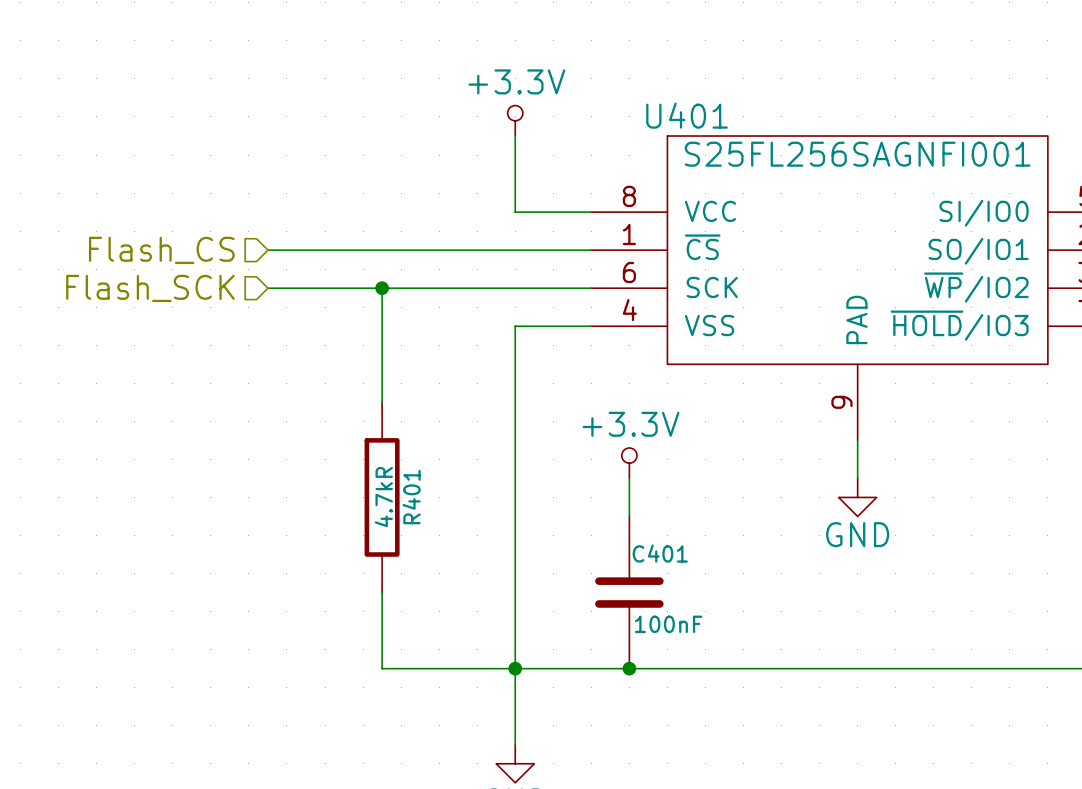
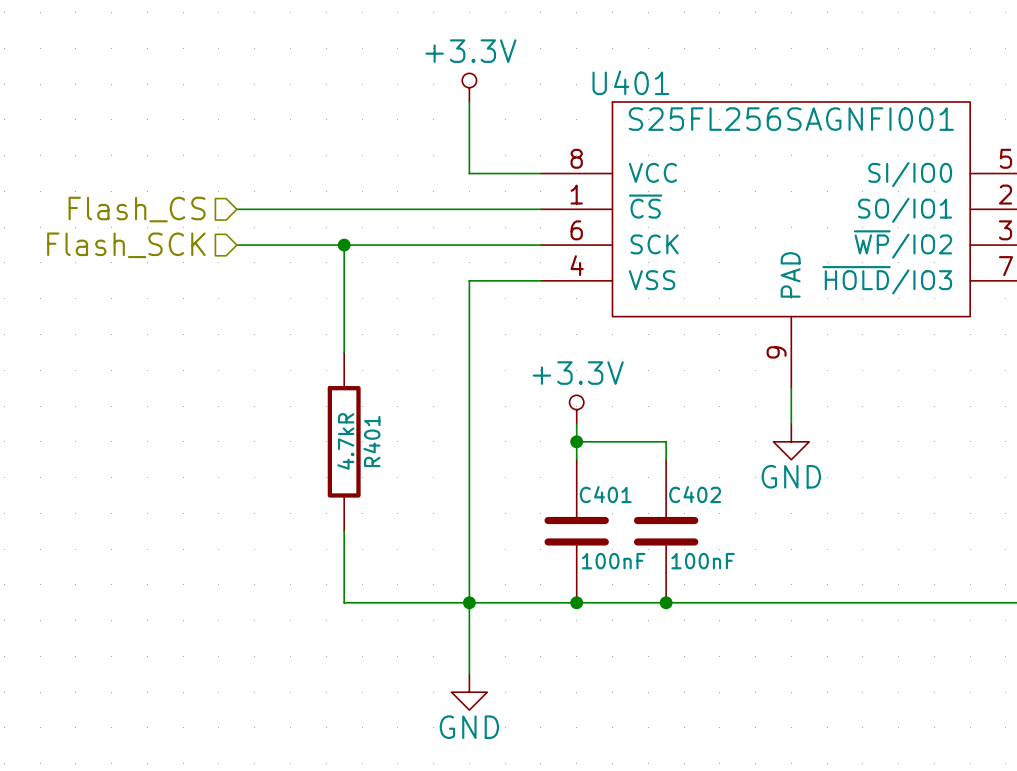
wire: none -> (576, 441) (666, 441) (666, 459)
junction: none -> (576, 441)
C402: none -> 100nF (666, 531)
junction: none -> (666, 602)

